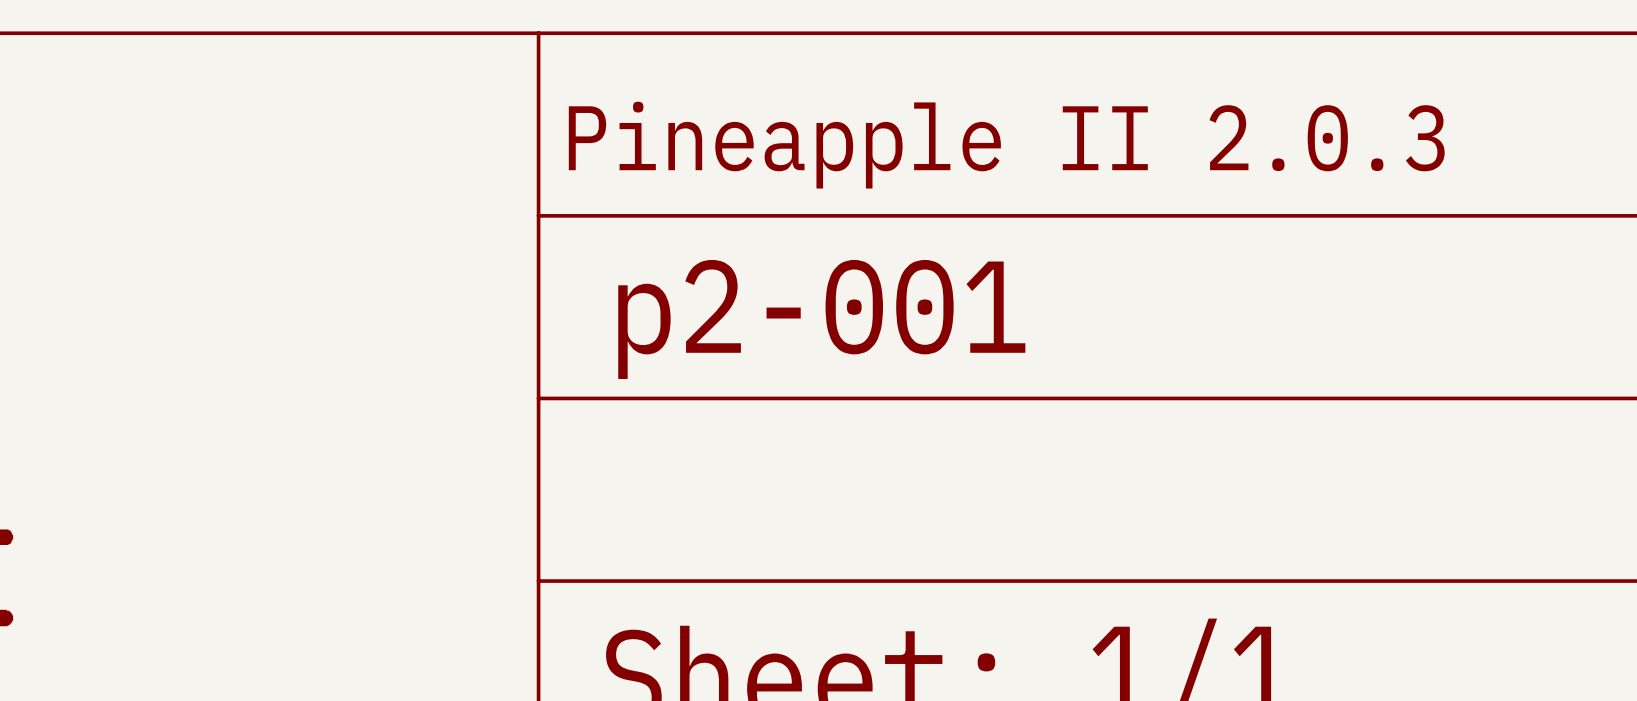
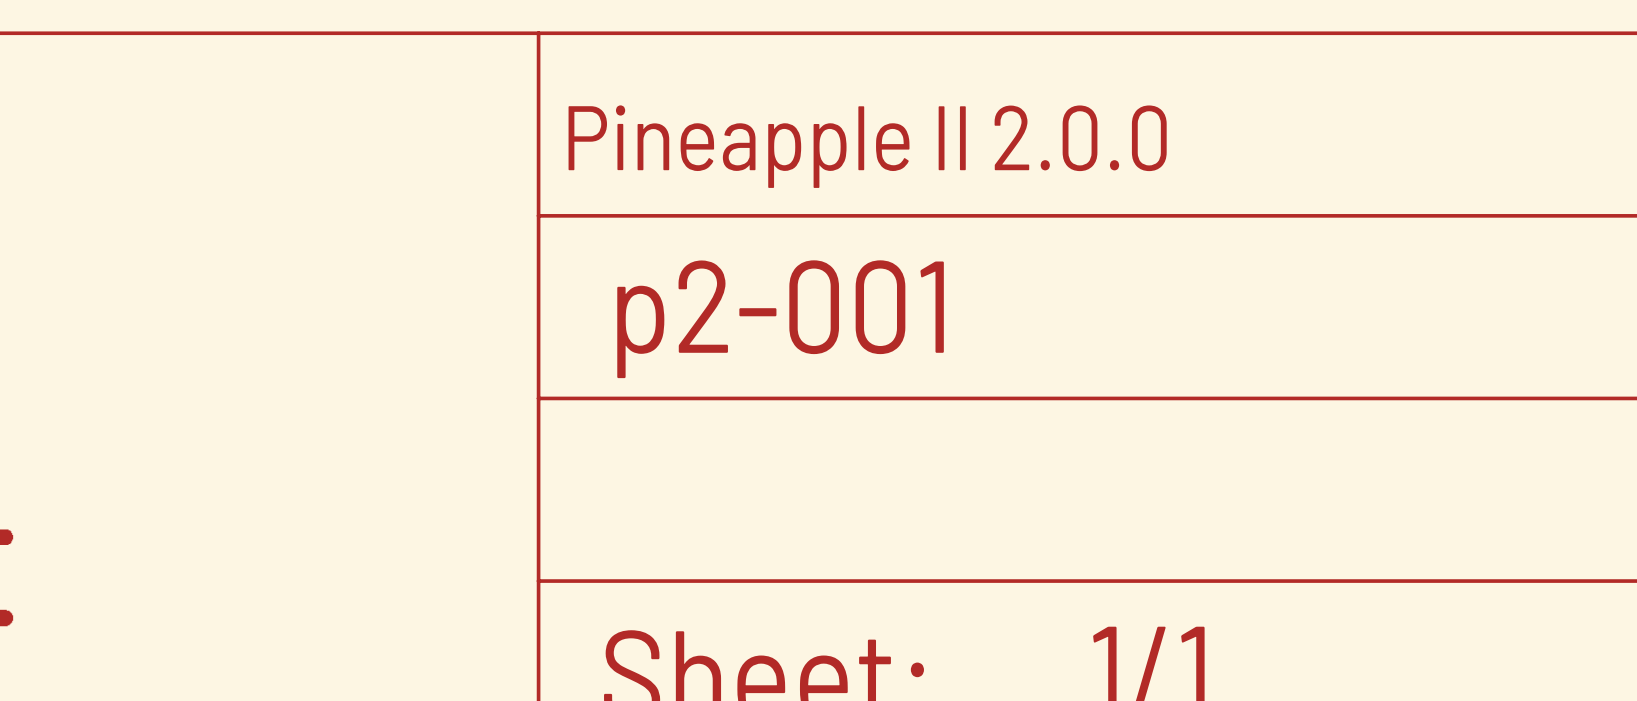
text: Pineapple II 2.0.3 (1006, 145) -> Pineapple II 2.0.0 (867, 146)

